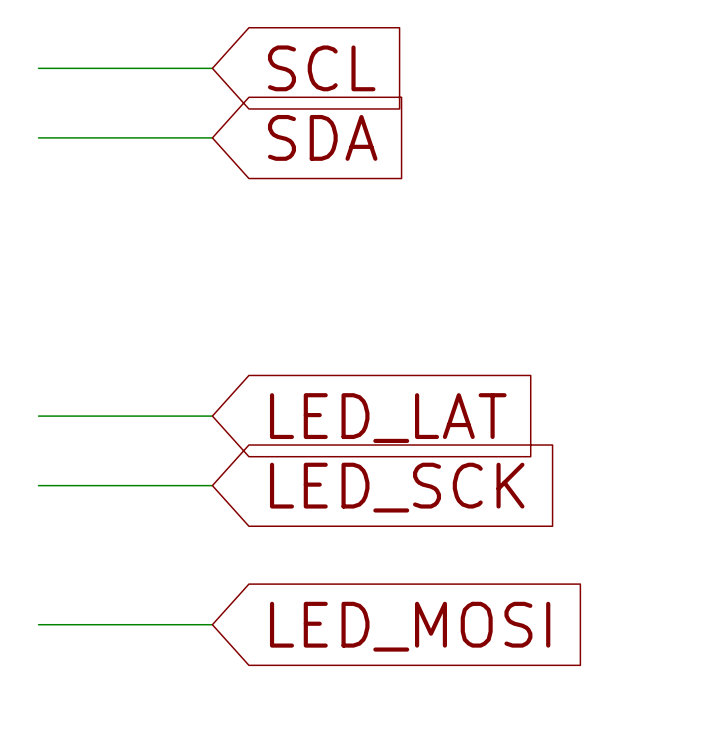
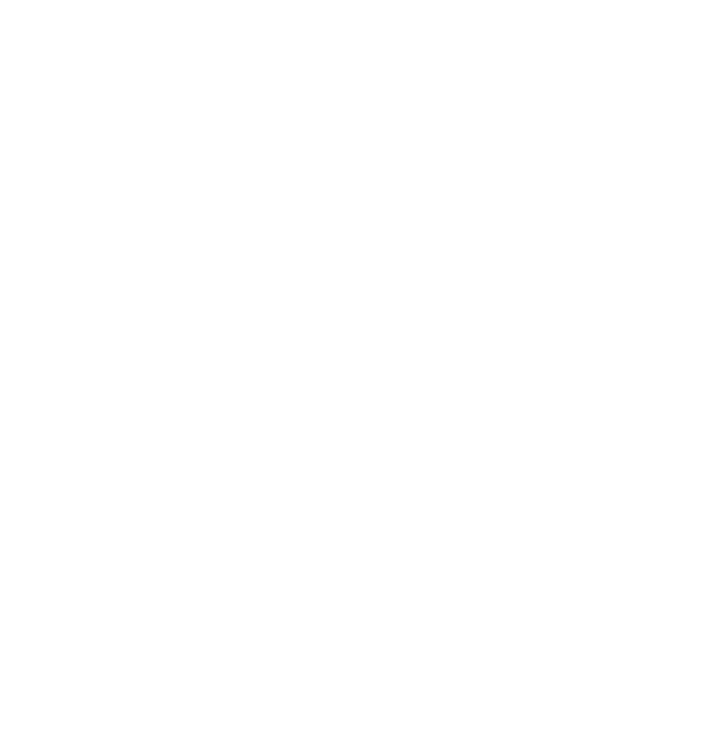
wire: (38, 68) (212, 68) -> none
global label: SCL (321, 68) -> none
wire: (38, 137) (212, 137) -> none
global label: SDA (322, 137) -> none
wire: (38, 416) (212, 416) -> none
global label: LED_LAT (388, 418) -> none
wire: (38, 485) (212, 485) -> none
global label: LED_SCK (397, 487) -> none
wire: (38, 624) (212, 624) -> none
global label: LED_MOSI (410, 626) -> none

